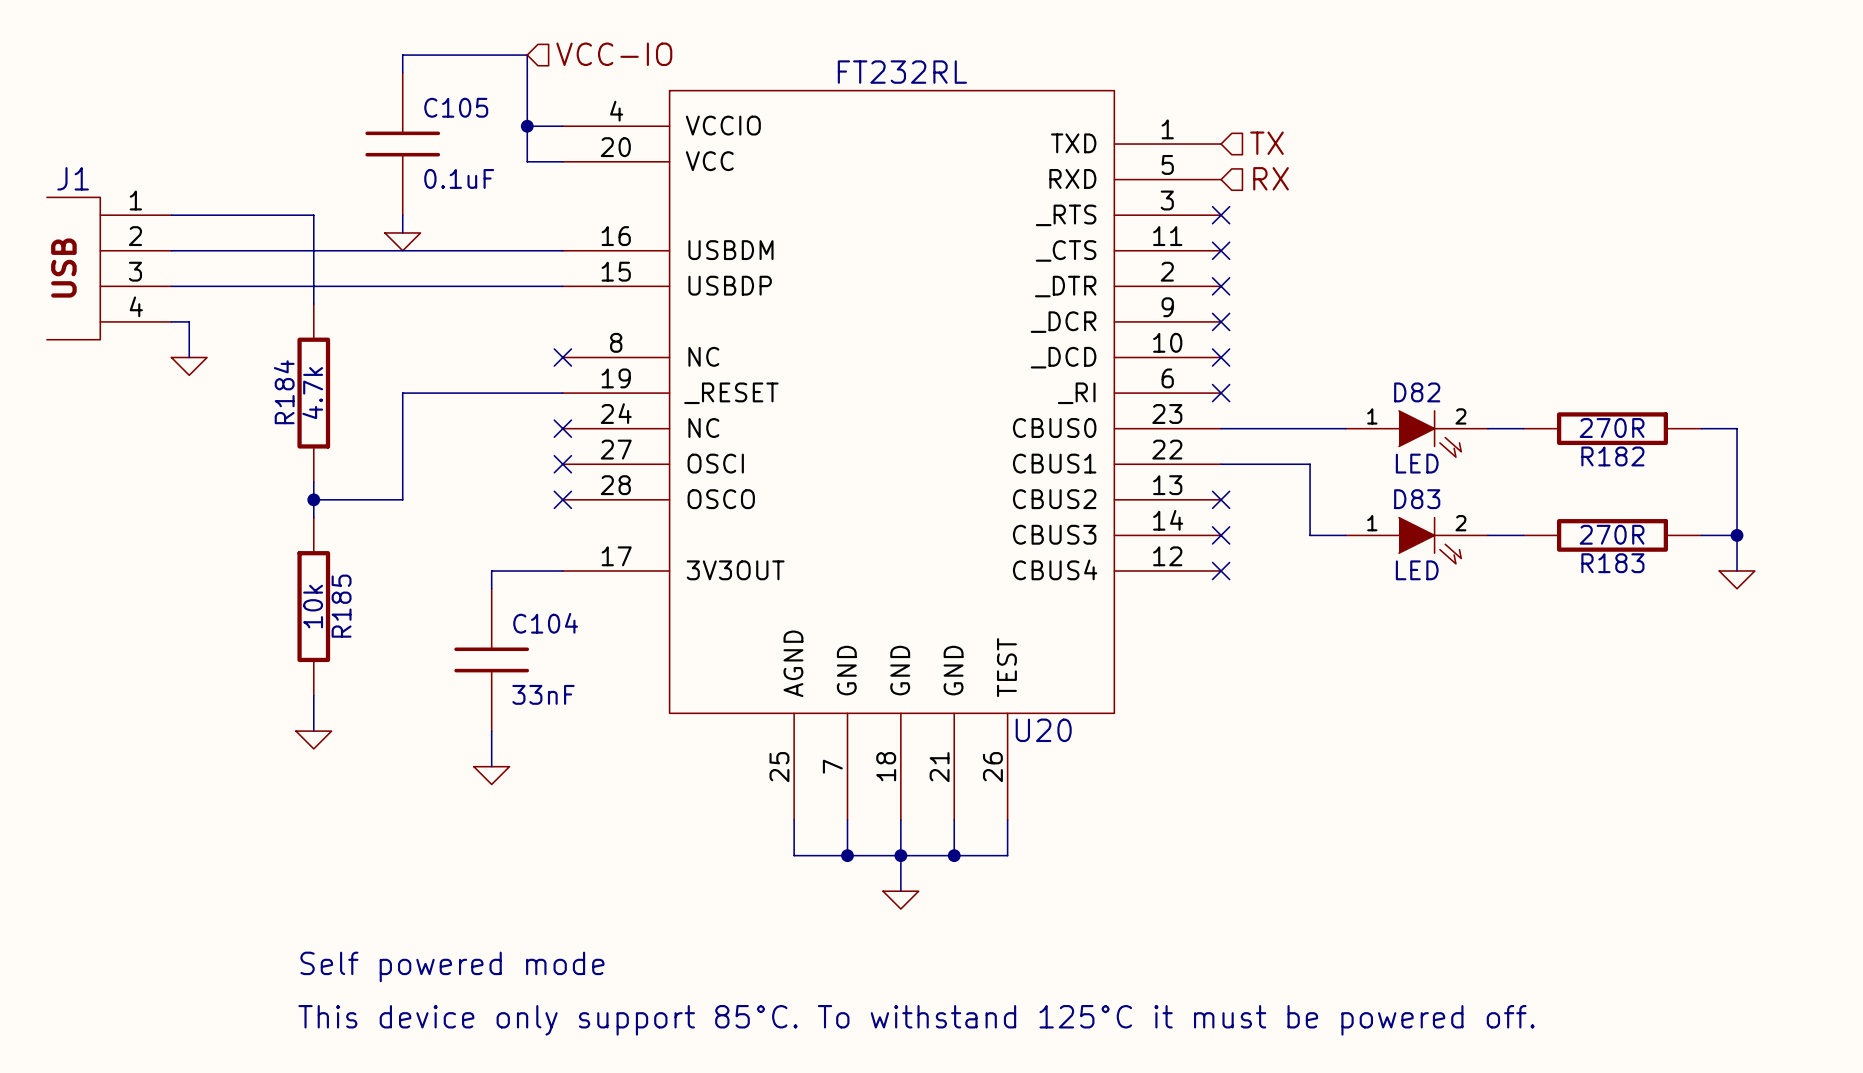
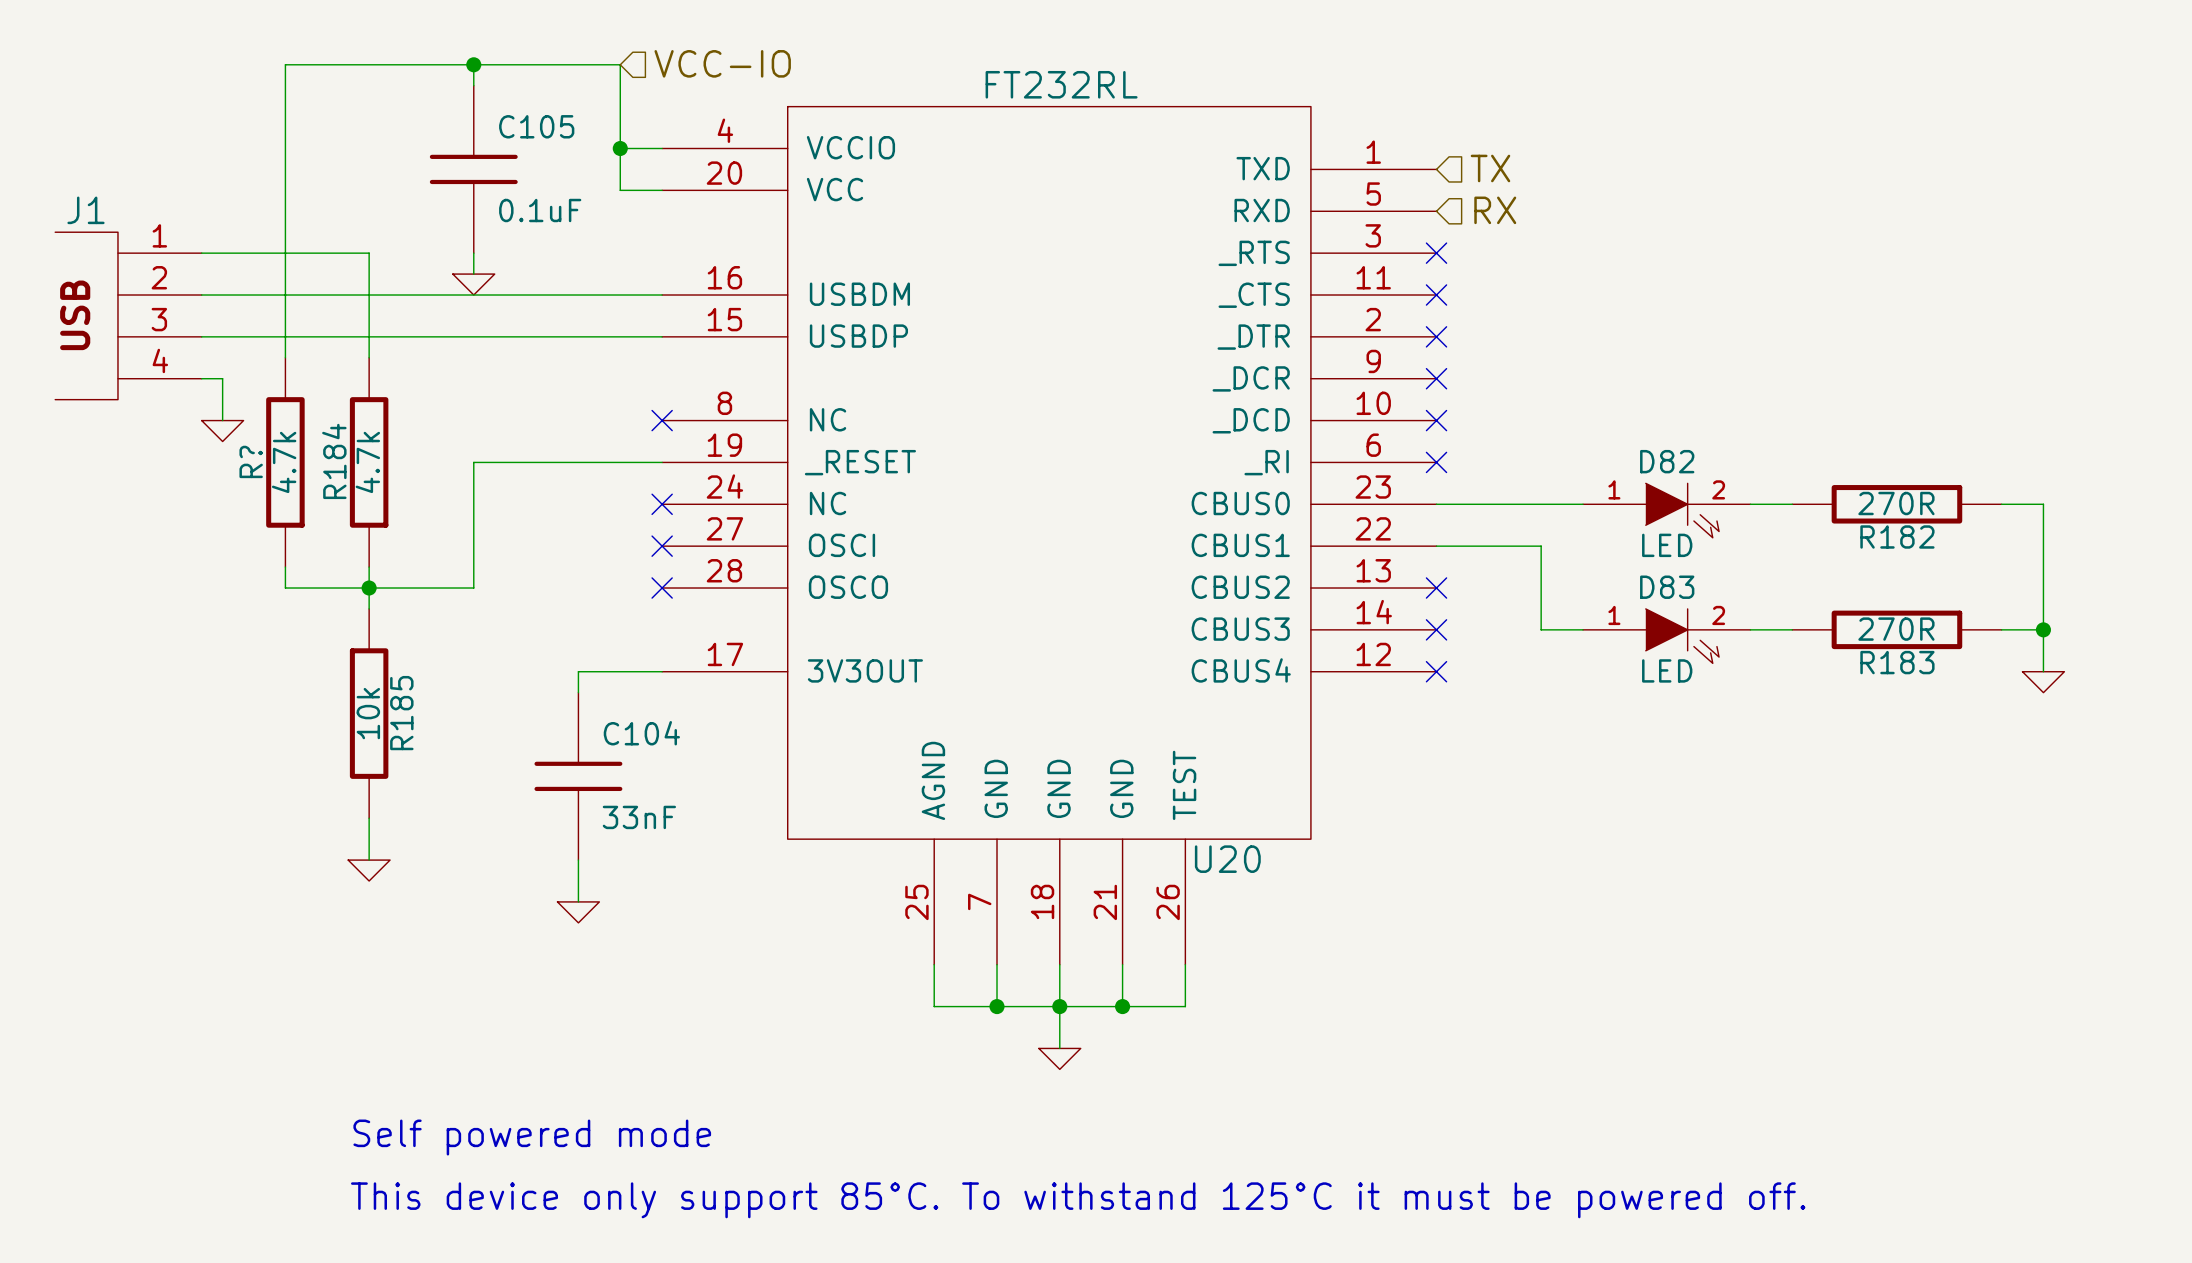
wire: none -> (473, 64) (285, 64) (285, 357)
junction: none -> (473, 64)
R?: none -> 4.7k (285, 462)
wire: none -> (285, 567) (285, 588) (369, 588)

